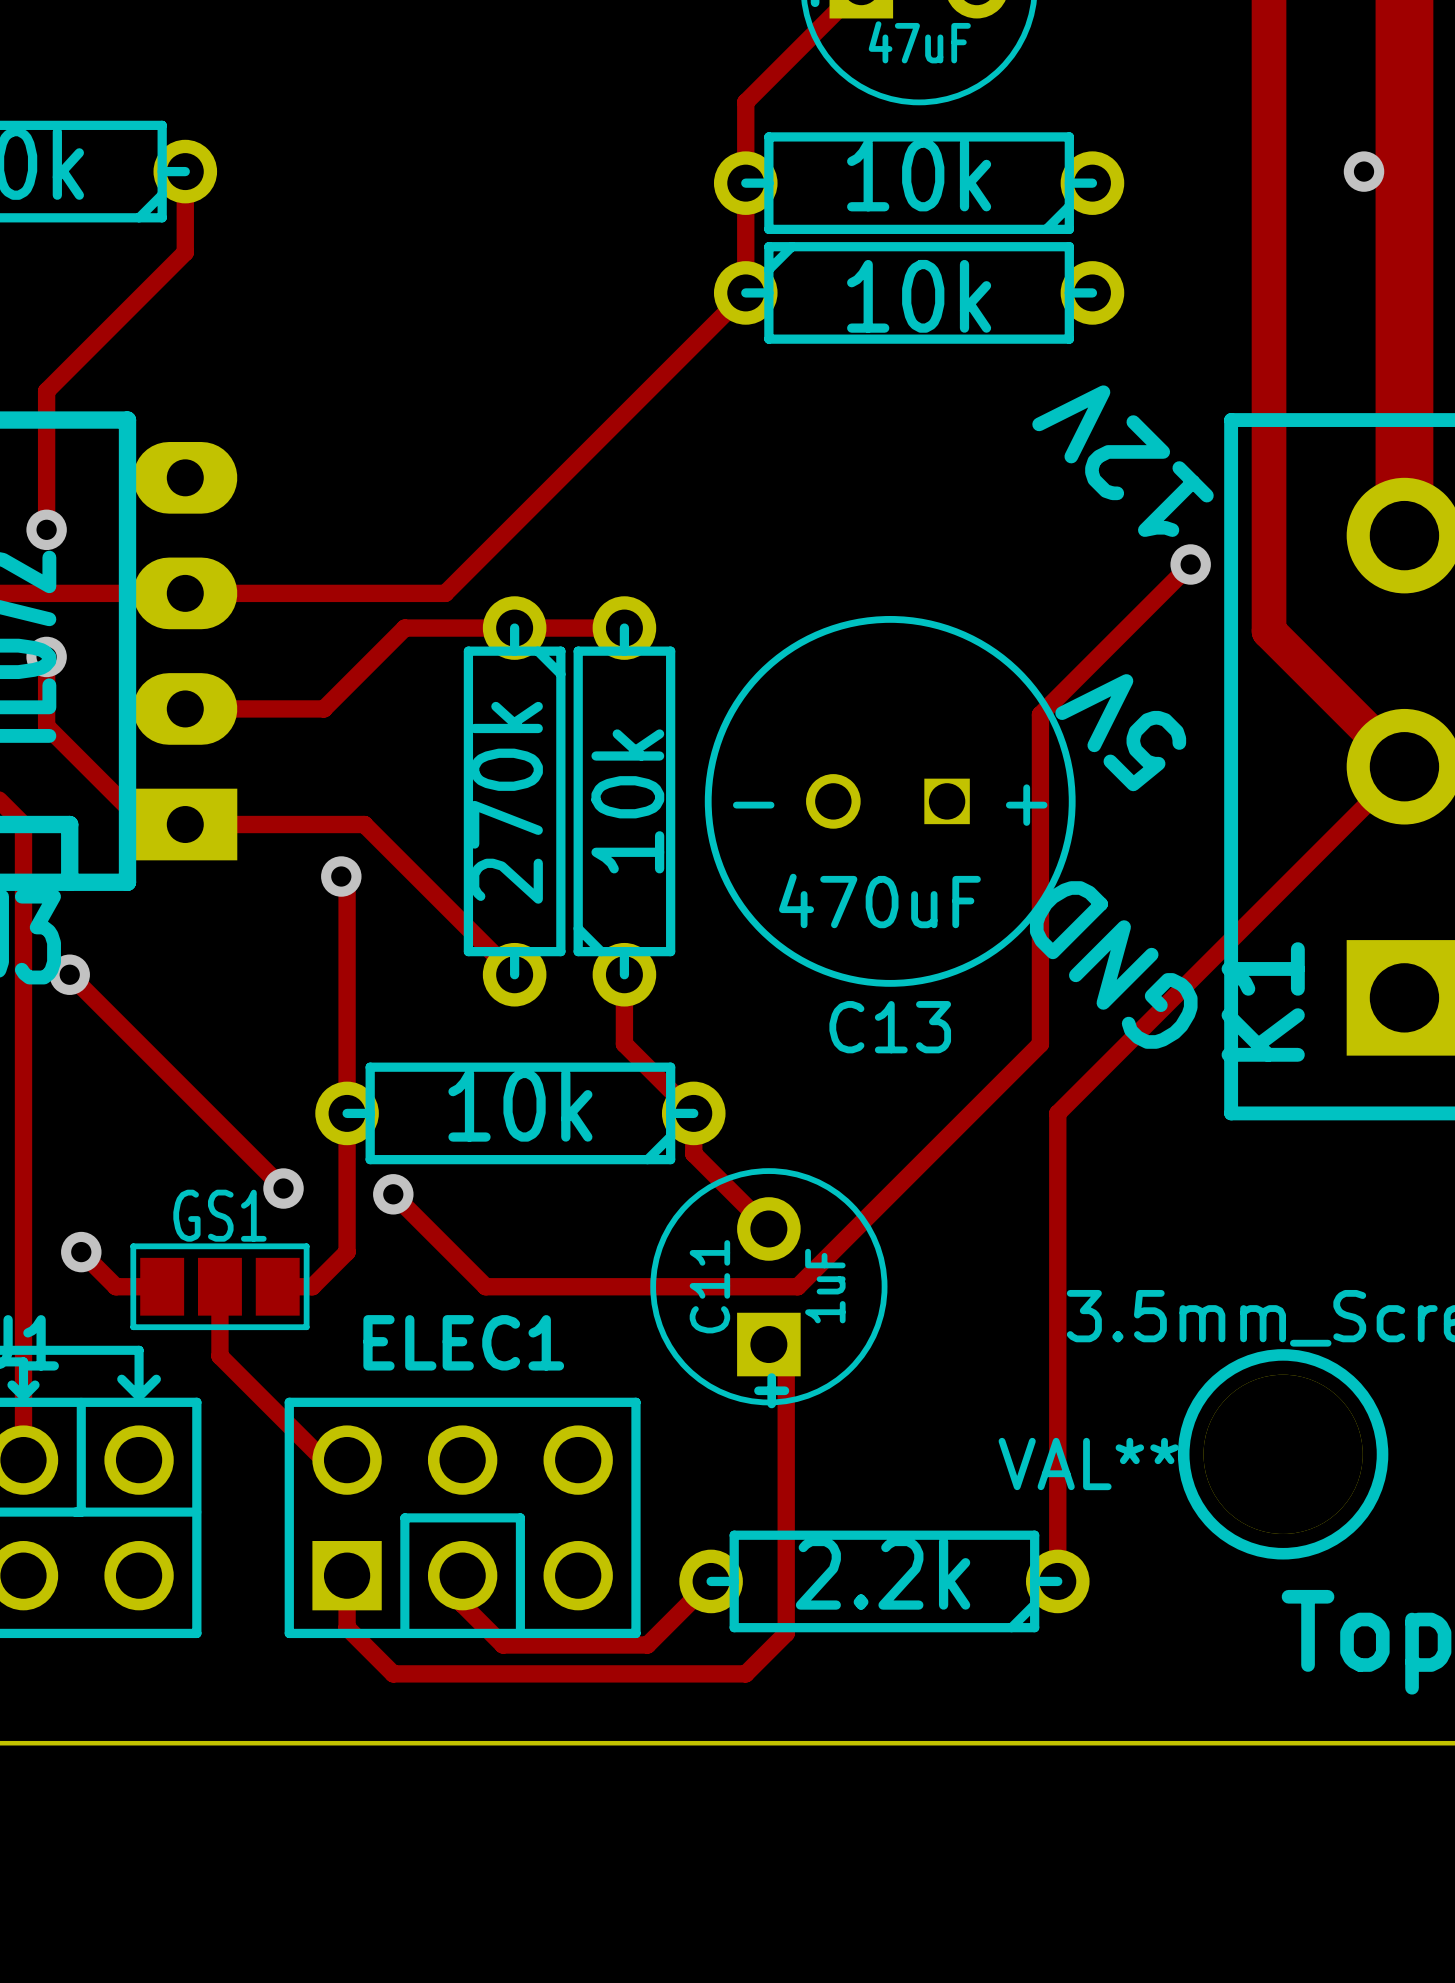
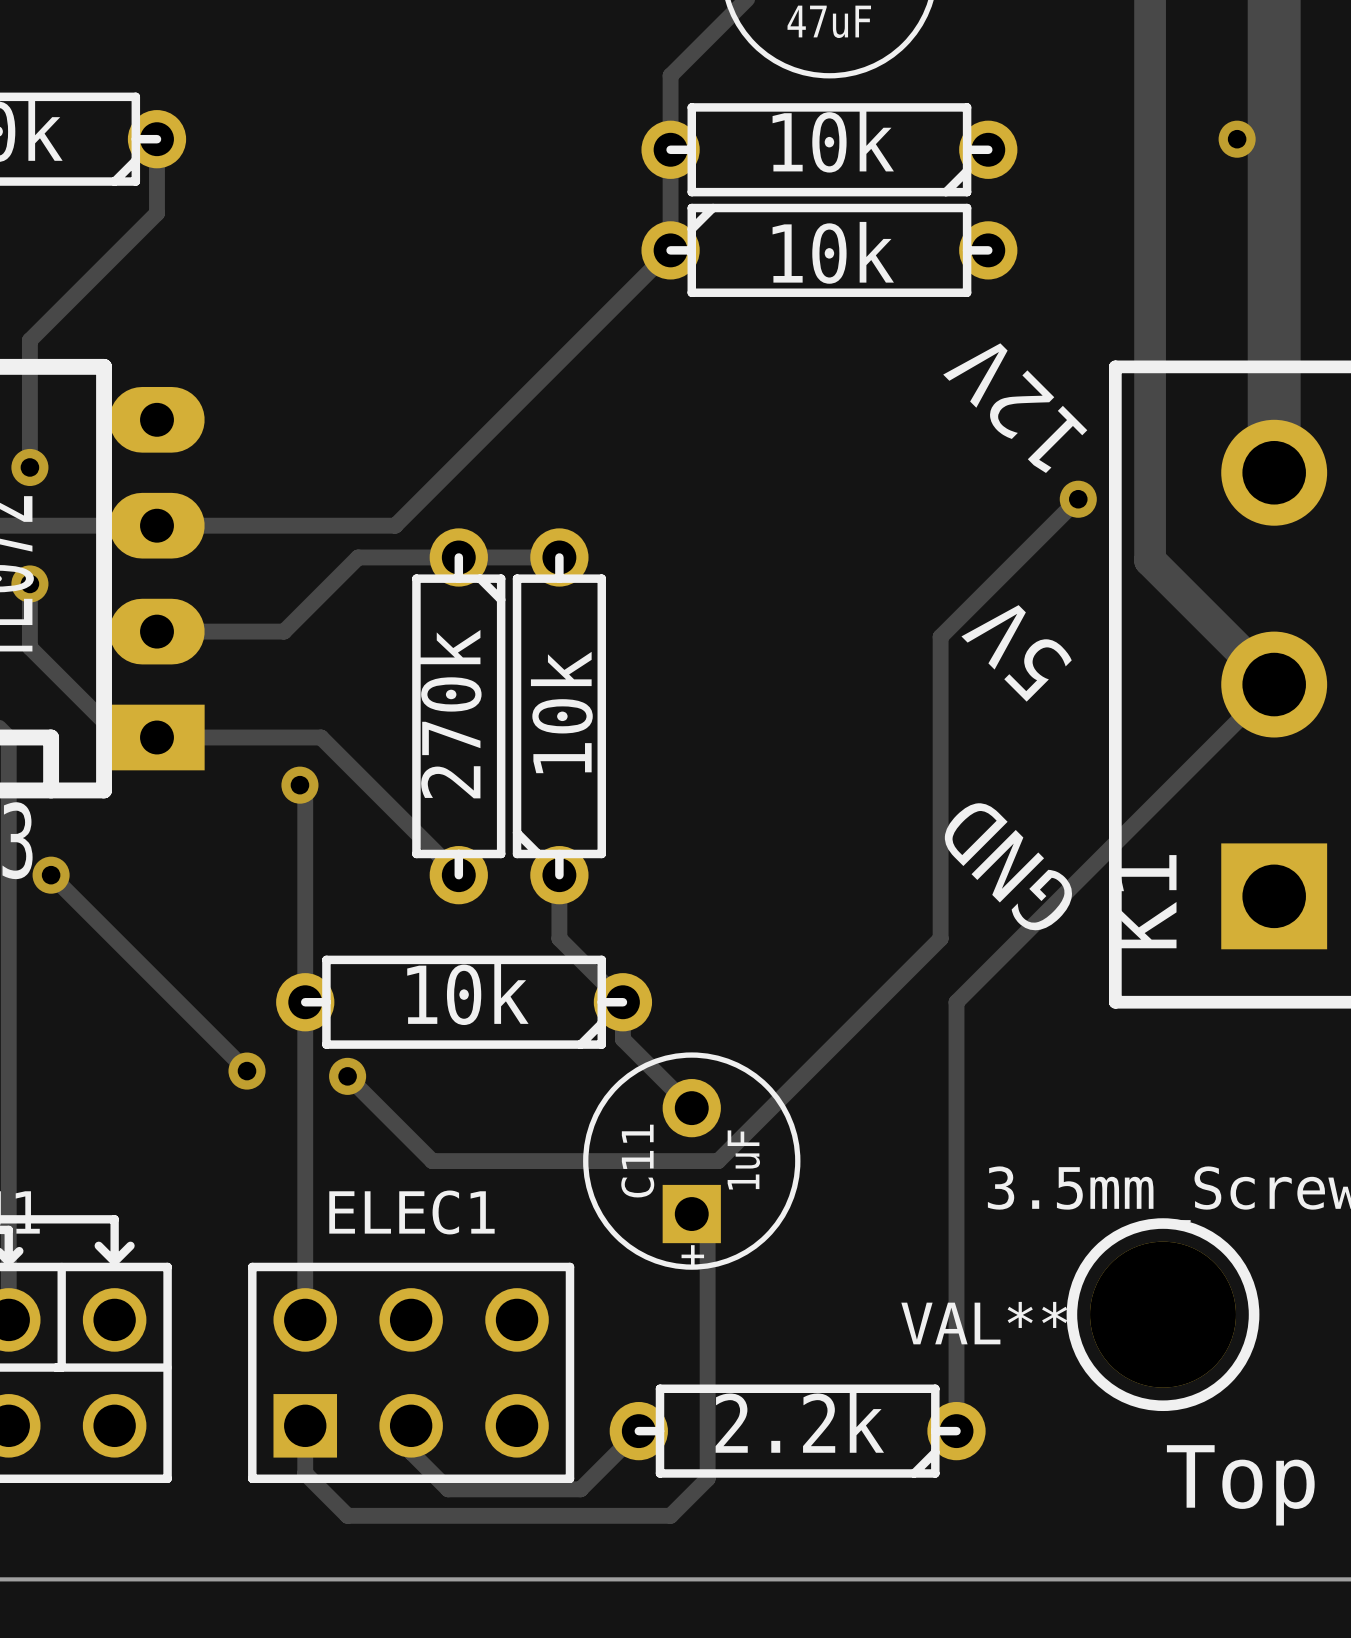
C13: 470uF (890, 801) -> none
track: (81, 1252) (115, 1286) (162, 1286) -> none
via: (81, 1252) -> none
track: (347, 1252) (312, 1286) (277, 1286) -> none
track: (219, 1286) (219, 1356) (323, 1460) (347, 1460) -> (305, 1129) (305, 1319)
GS1: (219, 1286) -> none
line: (404, 1633) (404, 1517) (520, 1517) (520, 1633) -> none

